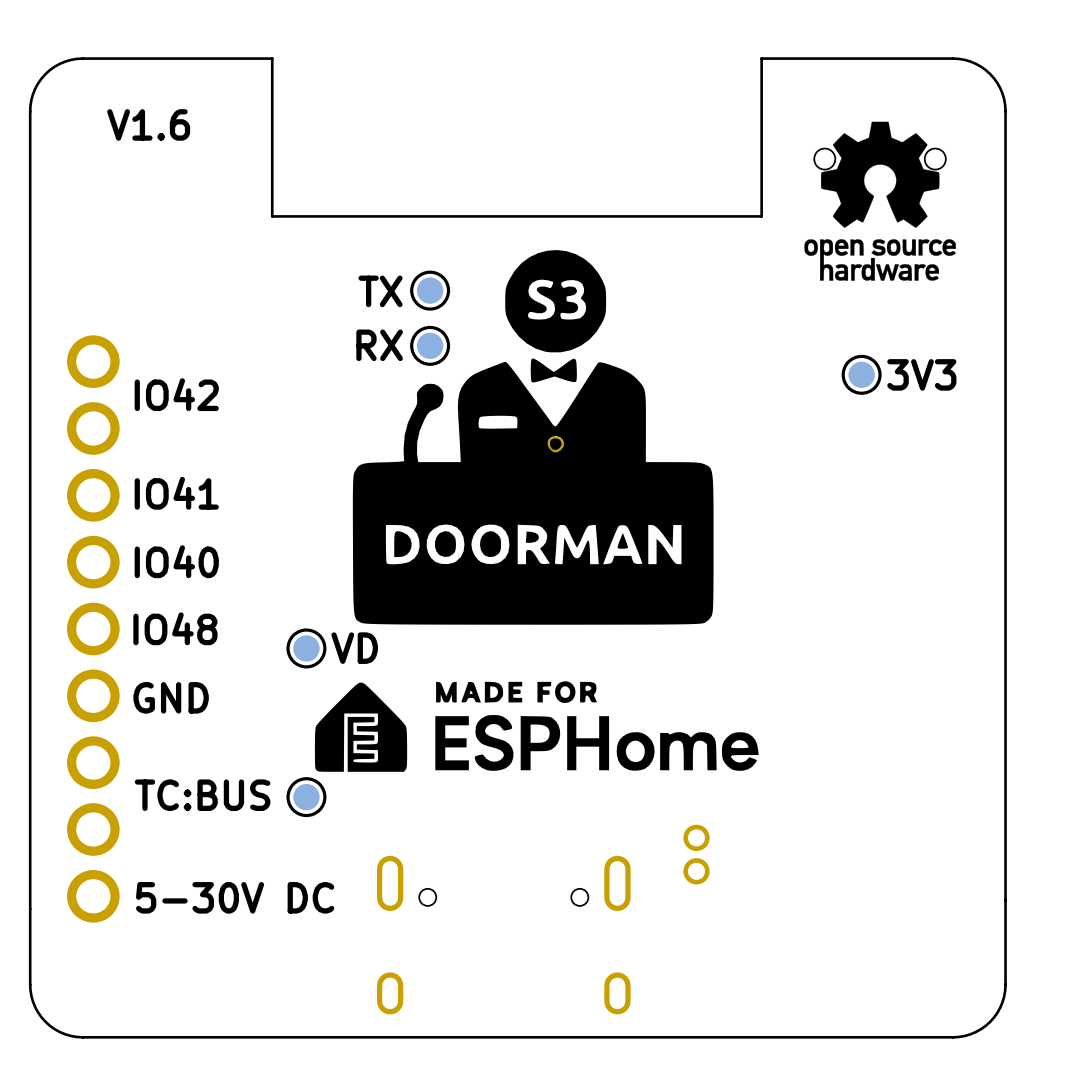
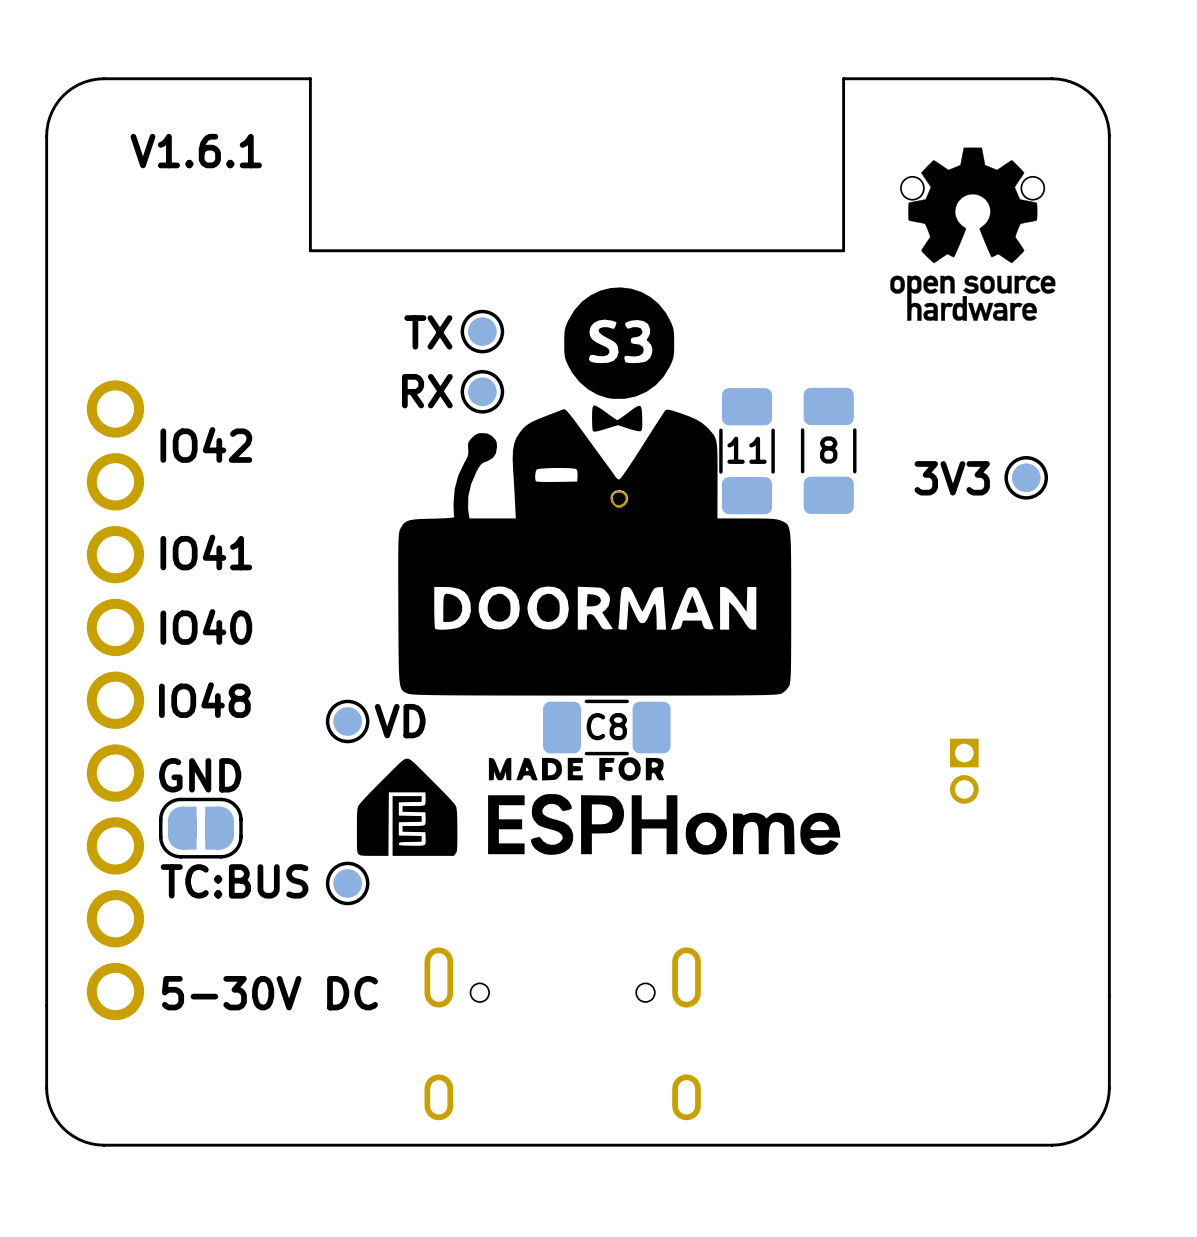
text: V1.6 (148, 124) -> V1.6.1 (196, 151)
part position: (861, 374) -> (1026, 477)
text position: 3V3 (921, 374) -> 3V3 (952, 478)
11: none -> (747, 451)
8: none -> (828, 450)
C8: none -> (606, 727)
part: none -> (964, 771)
part: none -> (200, 828)
part: (696, 854) -> none

